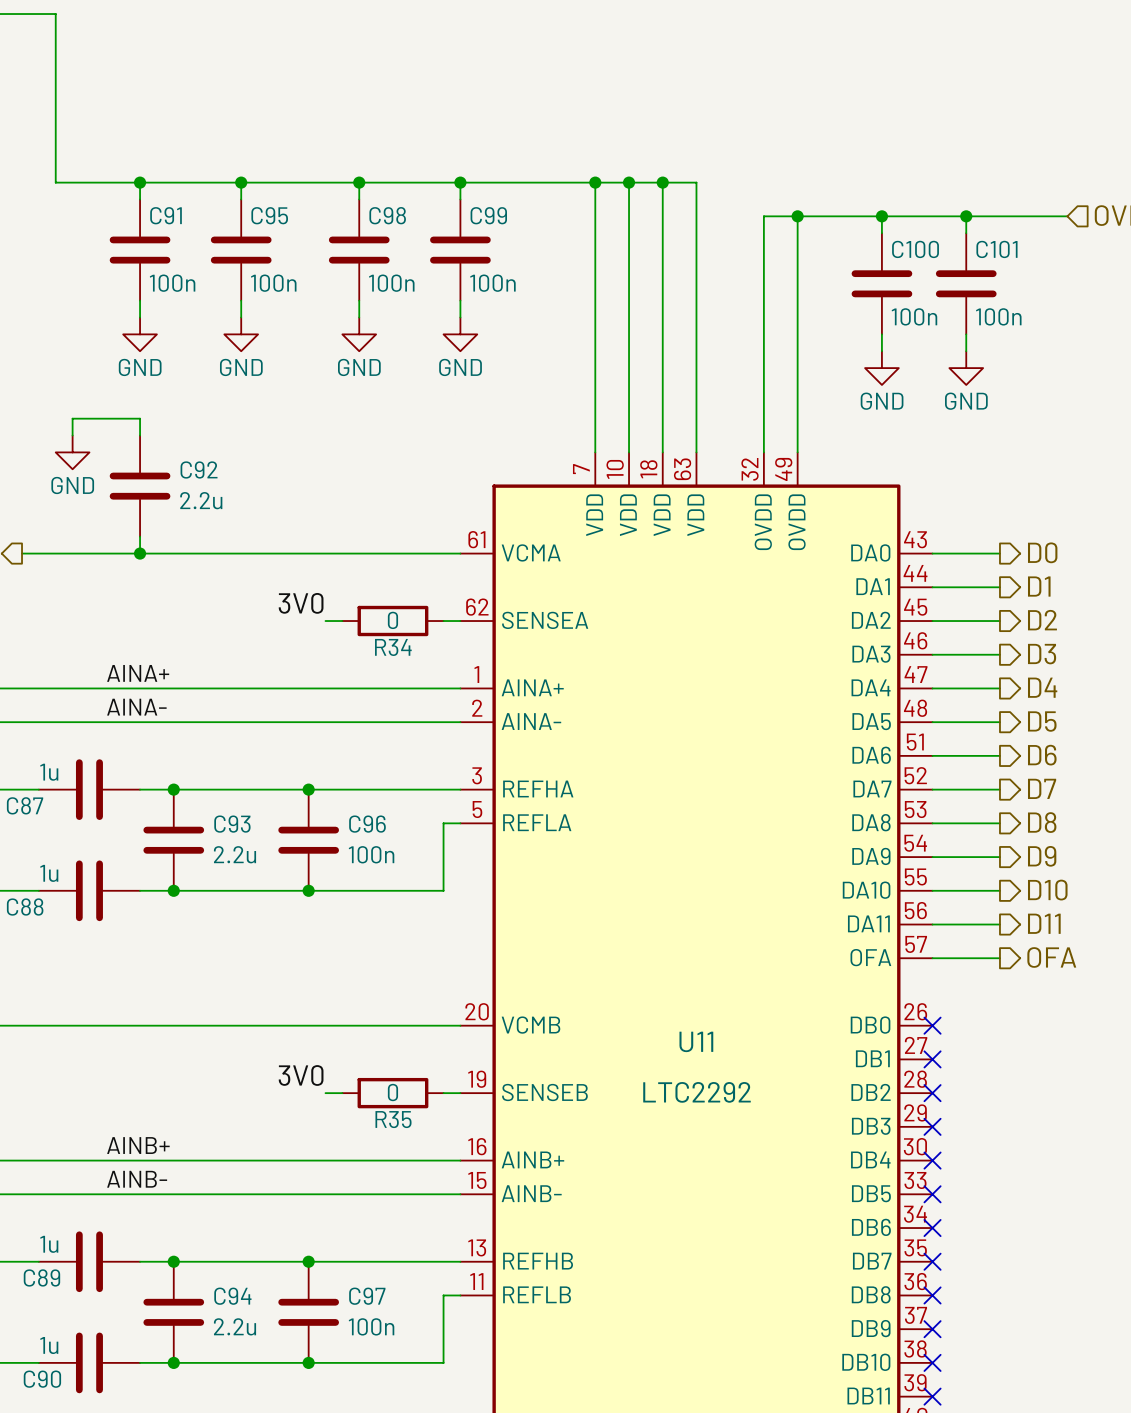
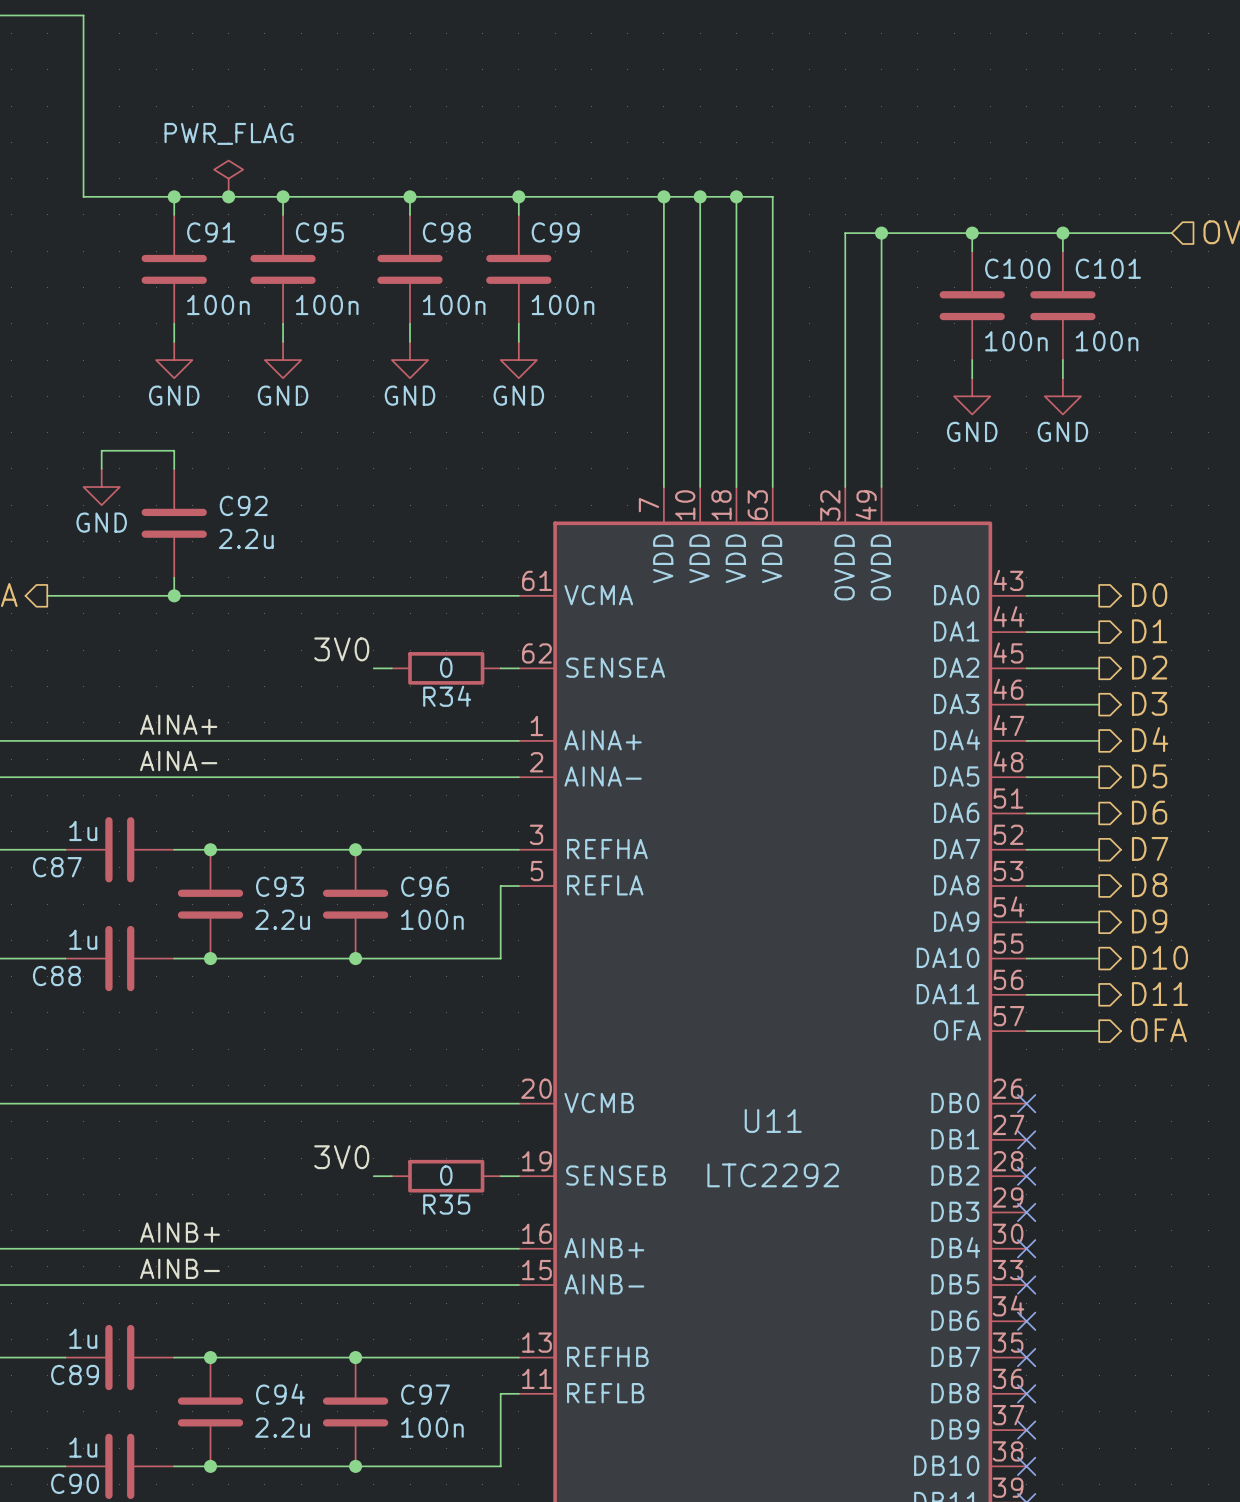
power symbol: none -> PWR_FLAG (228, 178)
junction: none -> (228, 196)

